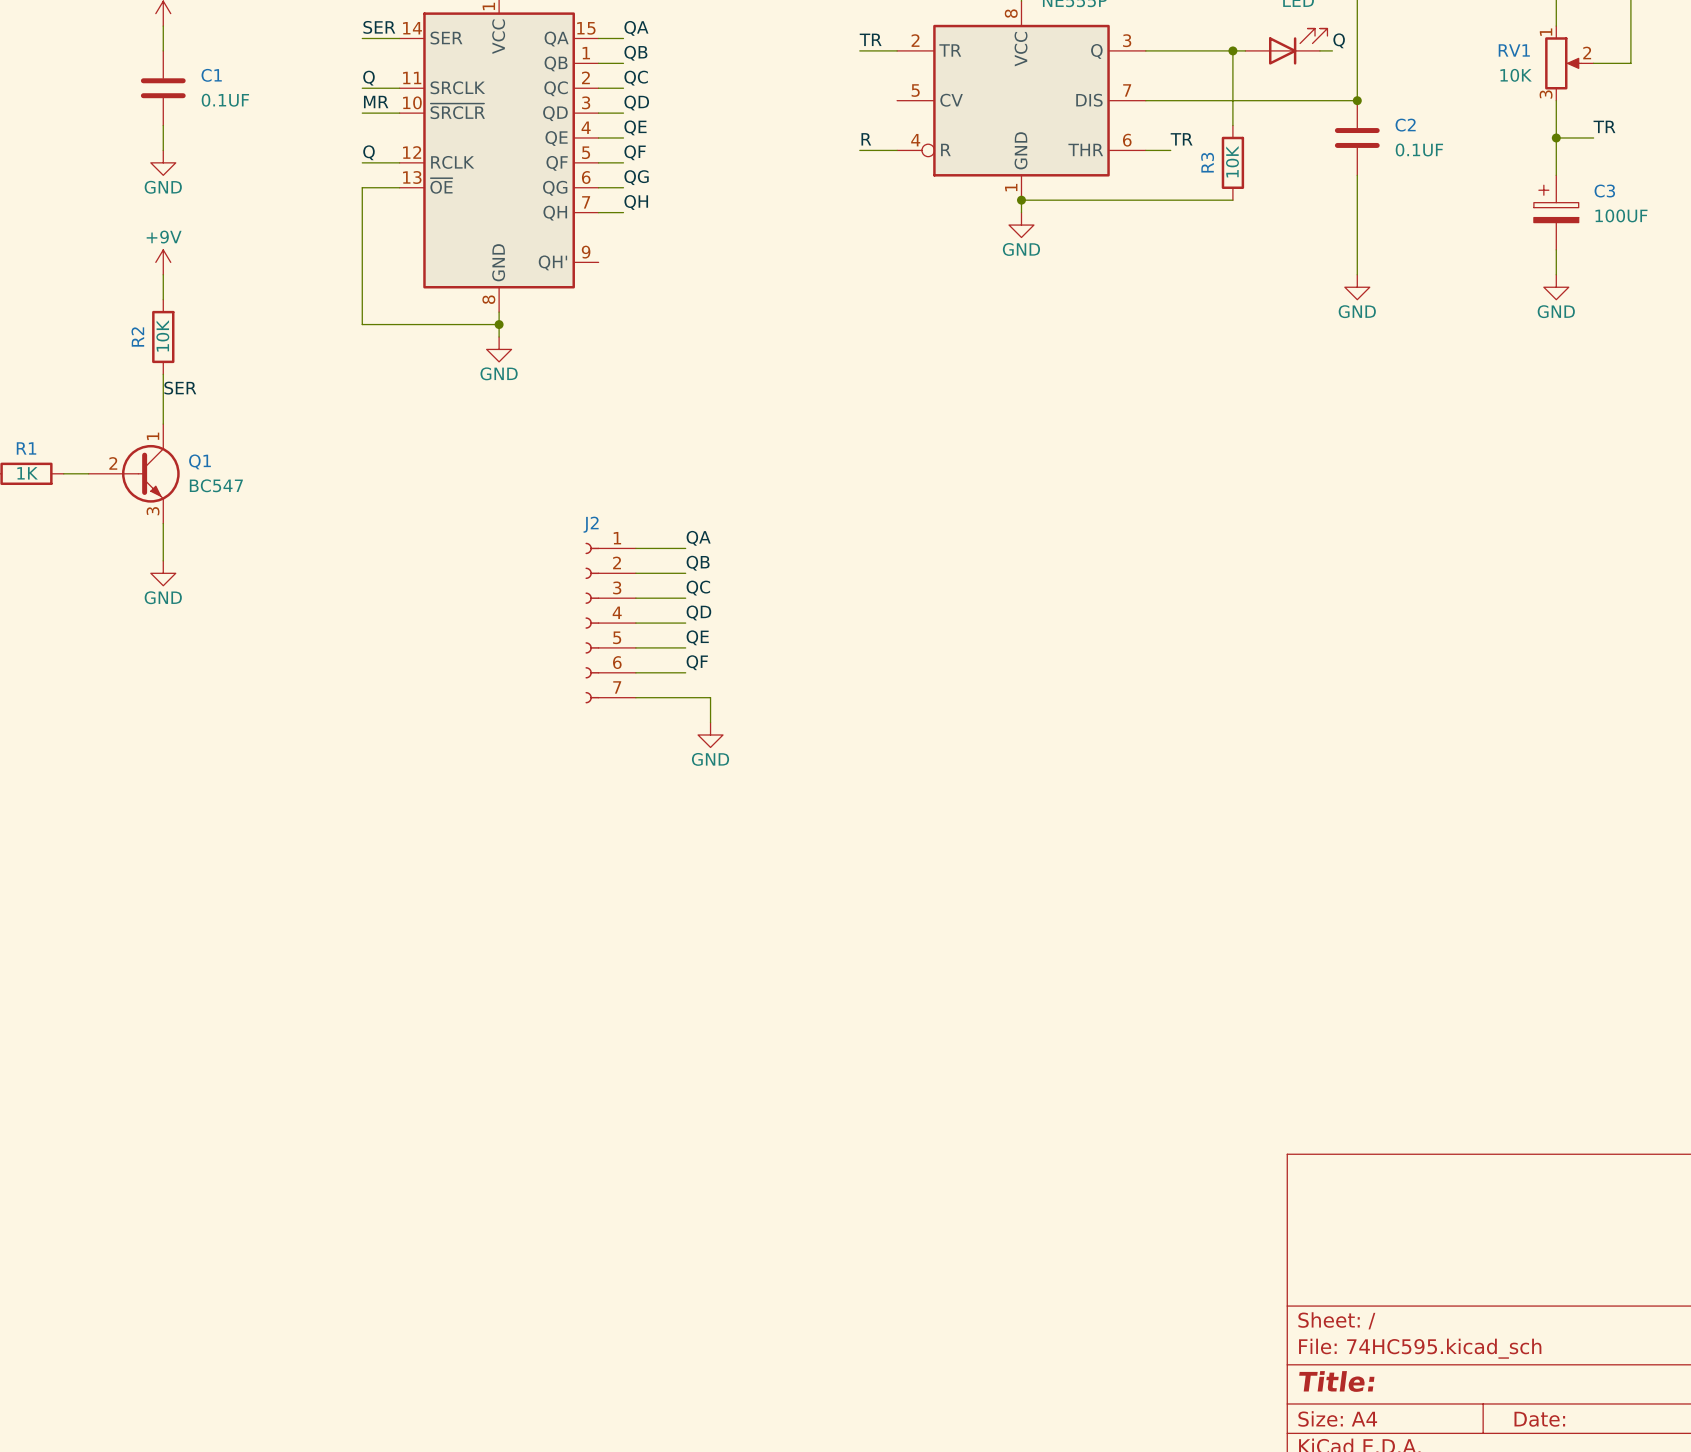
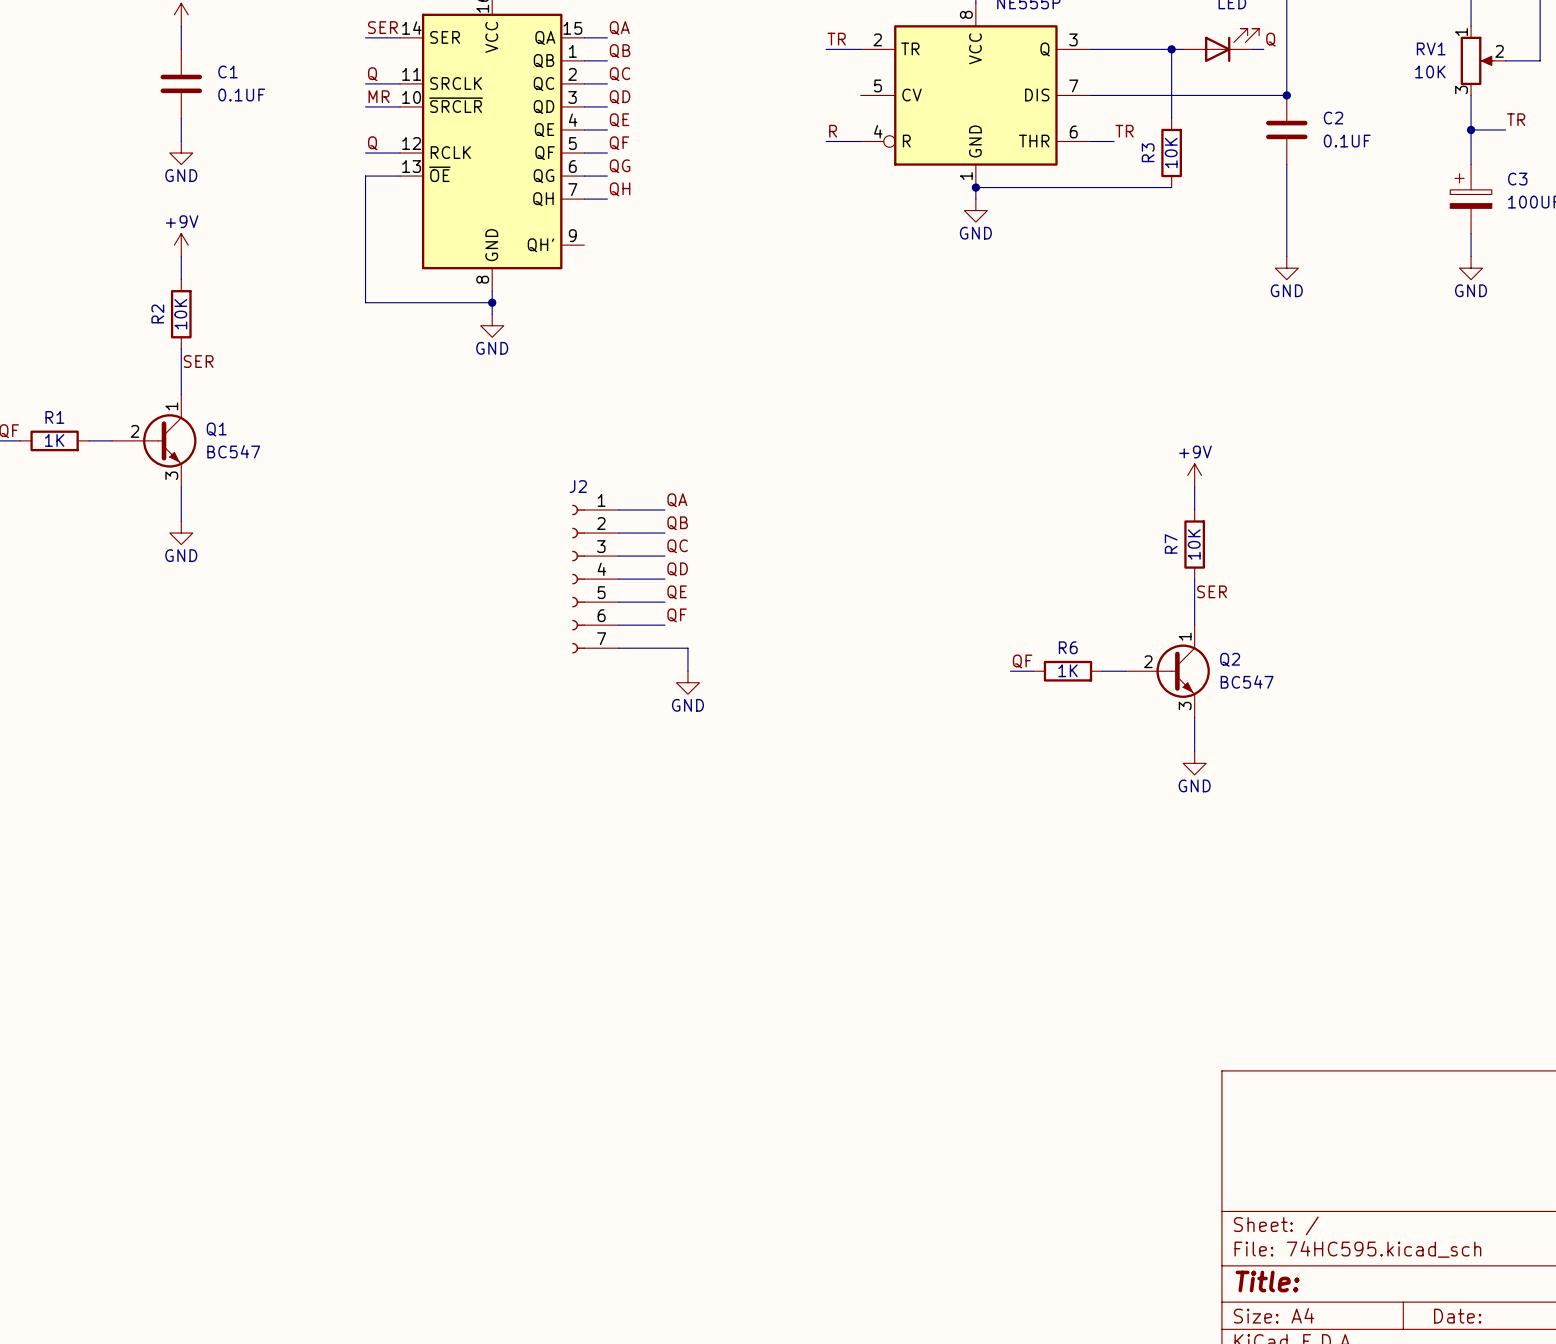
power symbol: none -> +9V (1194, 475)
wire: none -> (1194, 486) (1194, 510)
R7: none -> 10K (1194, 544)
wire: none -> (1194, 579) (1194, 625)
label: none -> SER (1212, 591)
label: none -> QF (1022, 661)
wire: none -> (1010, 671) (1033, 671)
R6: none -> 1K (1067, 671)
wire: none -> (1102, 671) (1125, 671)
Q2: none -> BC547 (1167, 671)
wire: none -> (1194, 717) (1194, 751)
power symbol: none -> GND (1194, 763)

